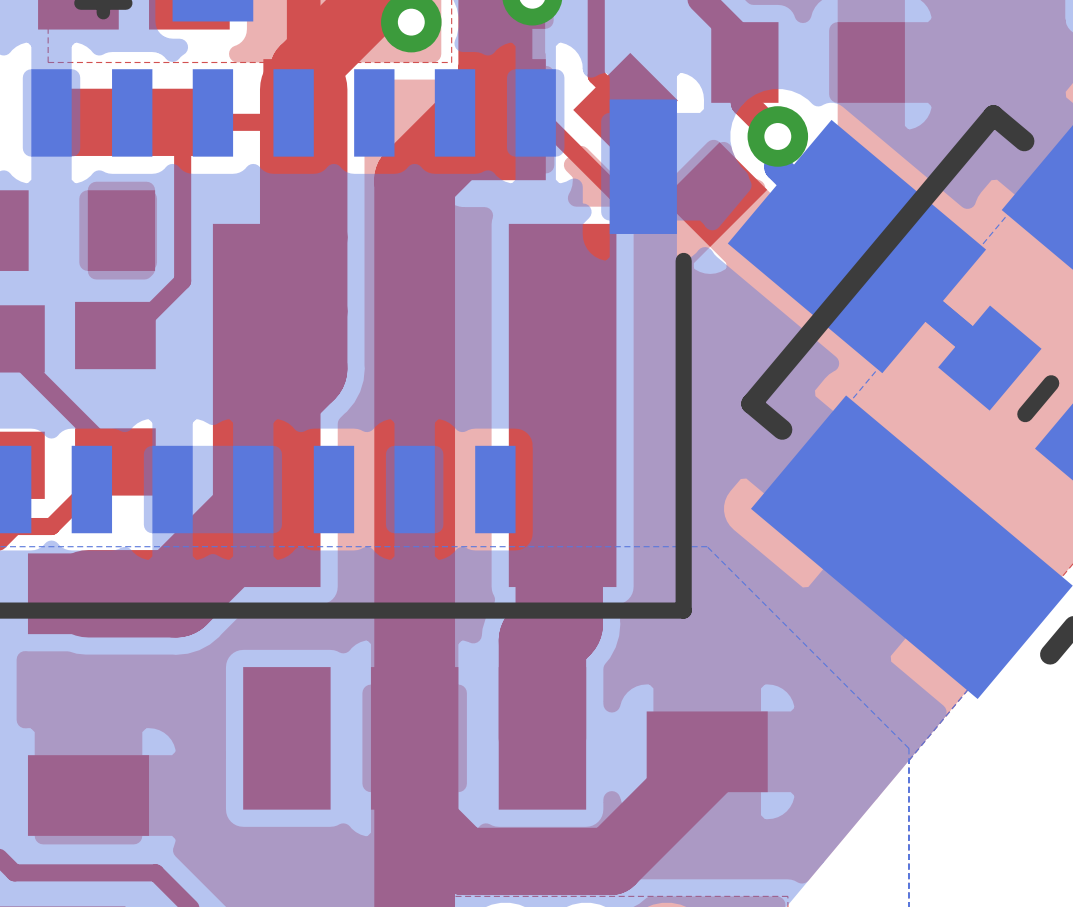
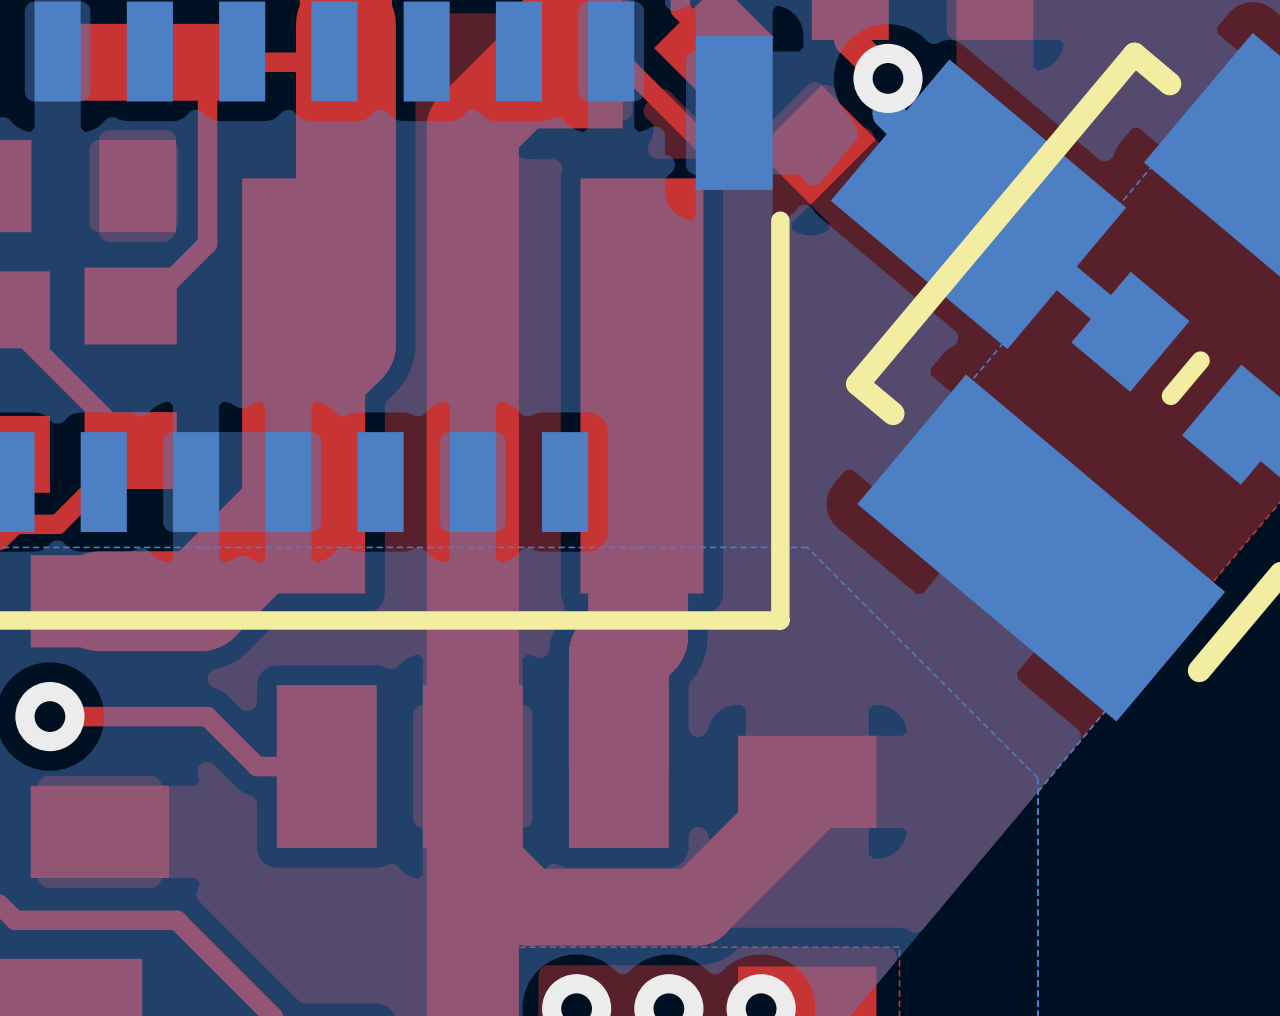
top track: none -> (49, 716) (207, 716) (257, 766) (326, 766)
via: none -> (49, 716)

